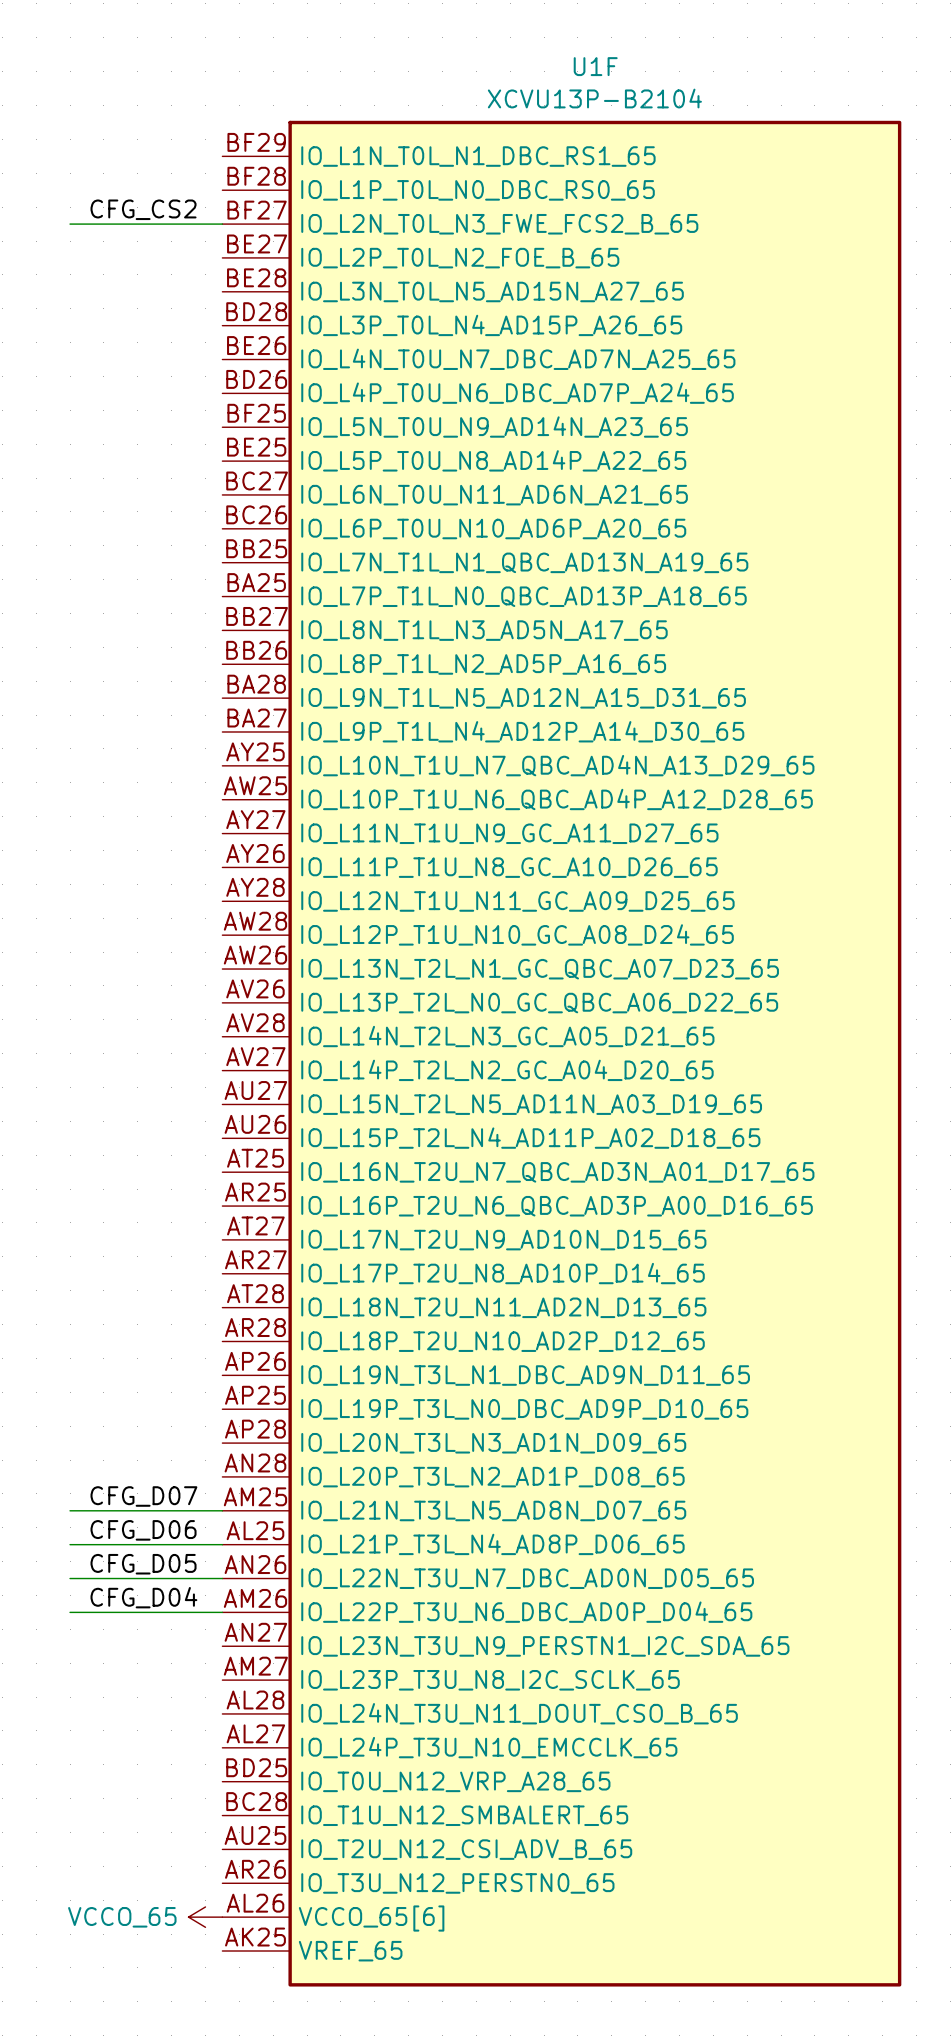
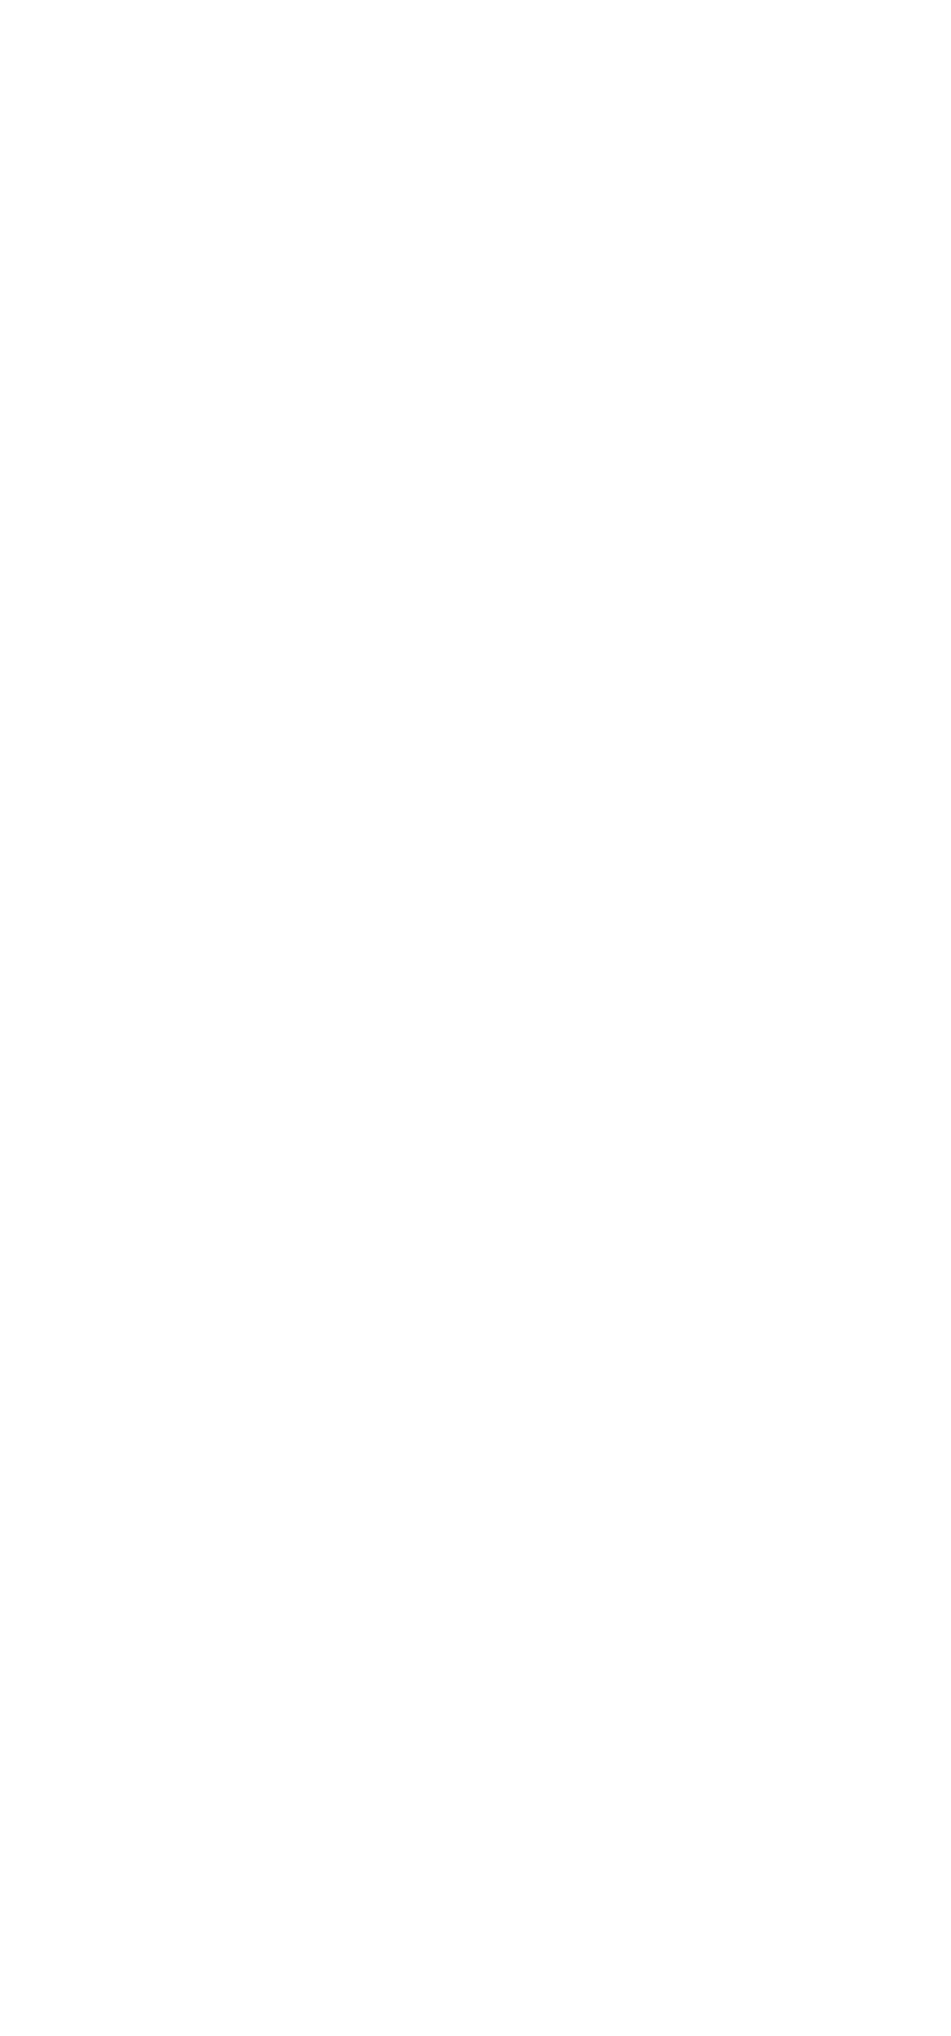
label: CFG_CS2 (143, 209) -> none
wire: (70, 224) (222, 224) -> none
U1F: XCVU13P-B2104 (561, 1053) -> none
label: CFG_D07 (143, 1496) -> none
wire: (70, 1510) (222, 1510) -> none
label: CFG_D06 (143, 1530) -> none
wire: (70, 1544) (222, 1544) -> none
label: CFG_D05 (143, 1564) -> none
wire: (70, 1578) (222, 1578) -> none
label: CFG_D04 (143, 1597) -> none
wire: (70, 1612) (222, 1612) -> none
power symbol: VCCO_65 (205, 1917) -> none

